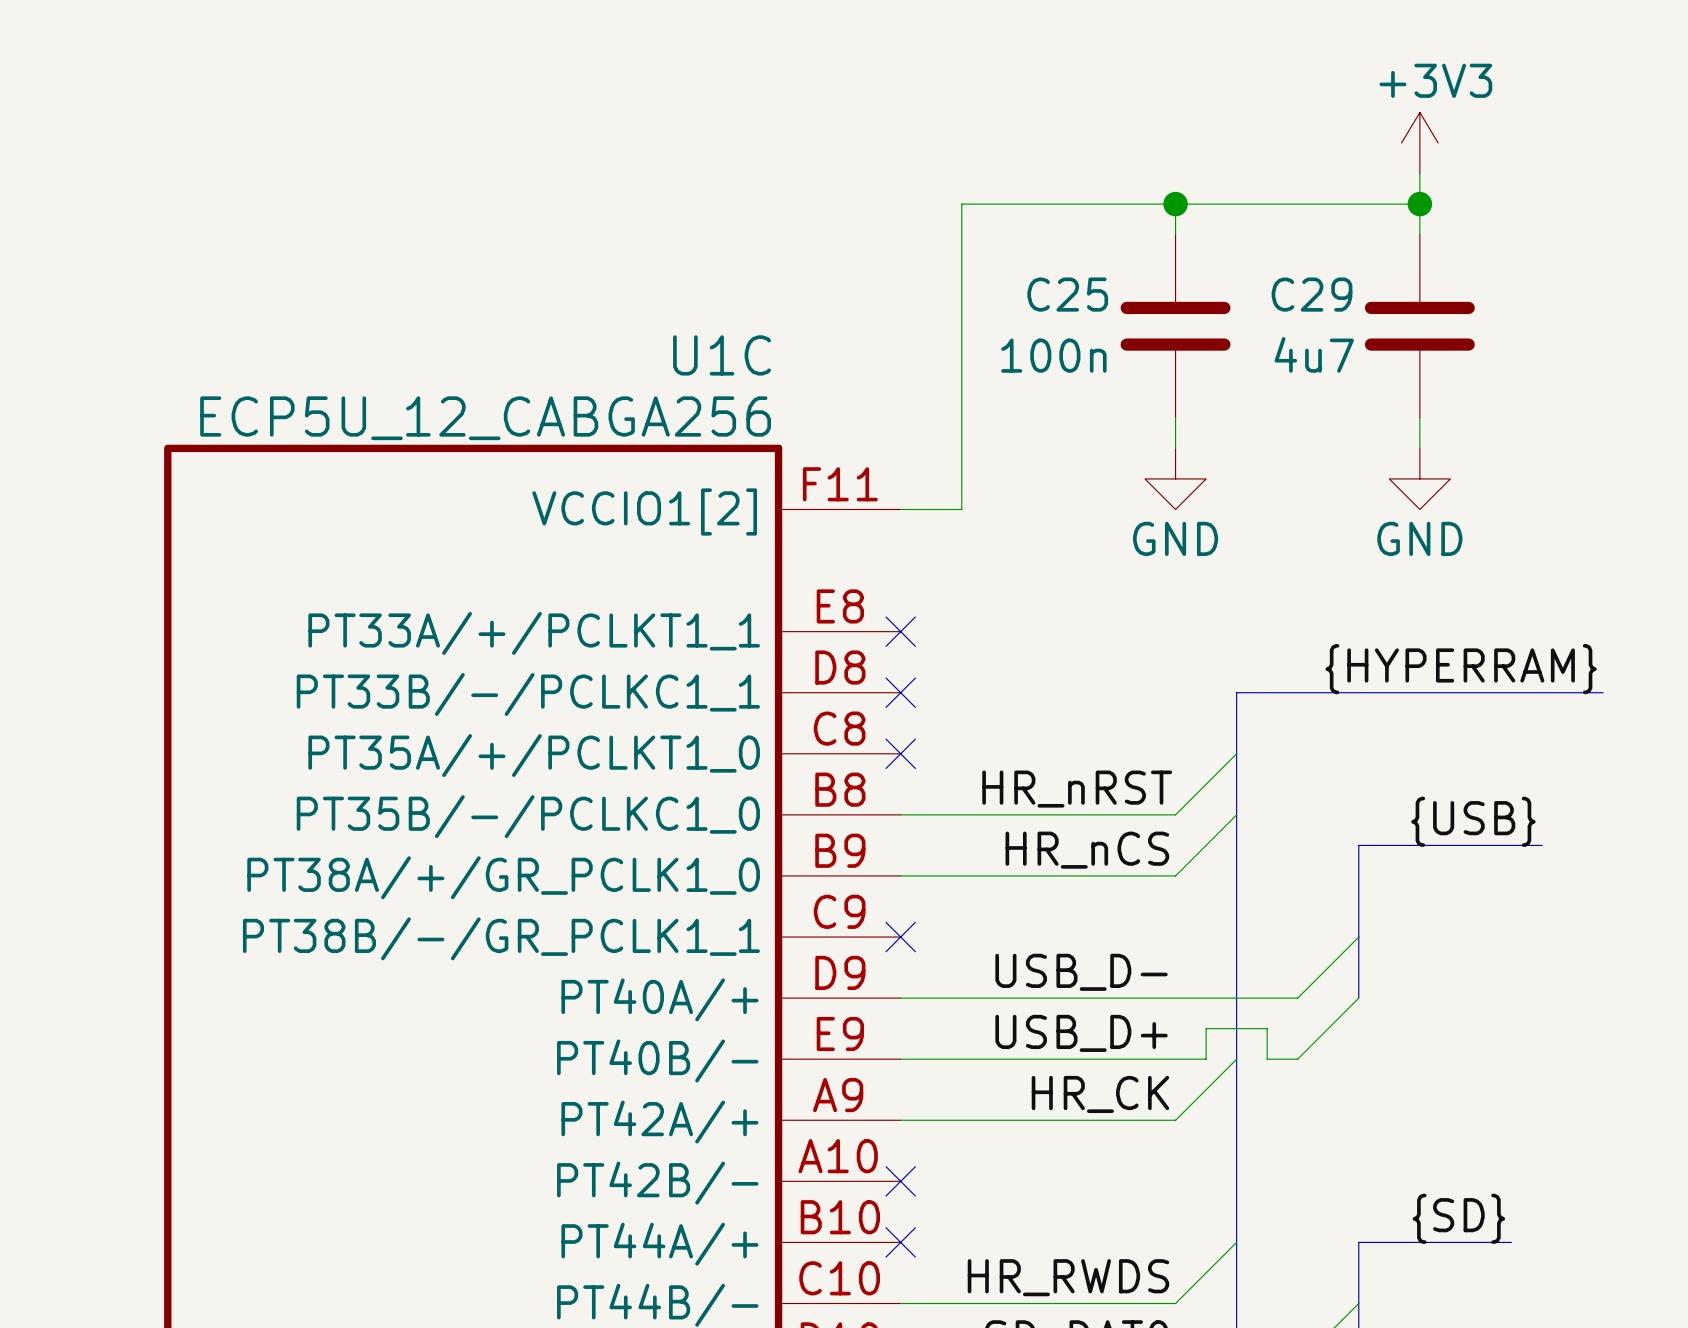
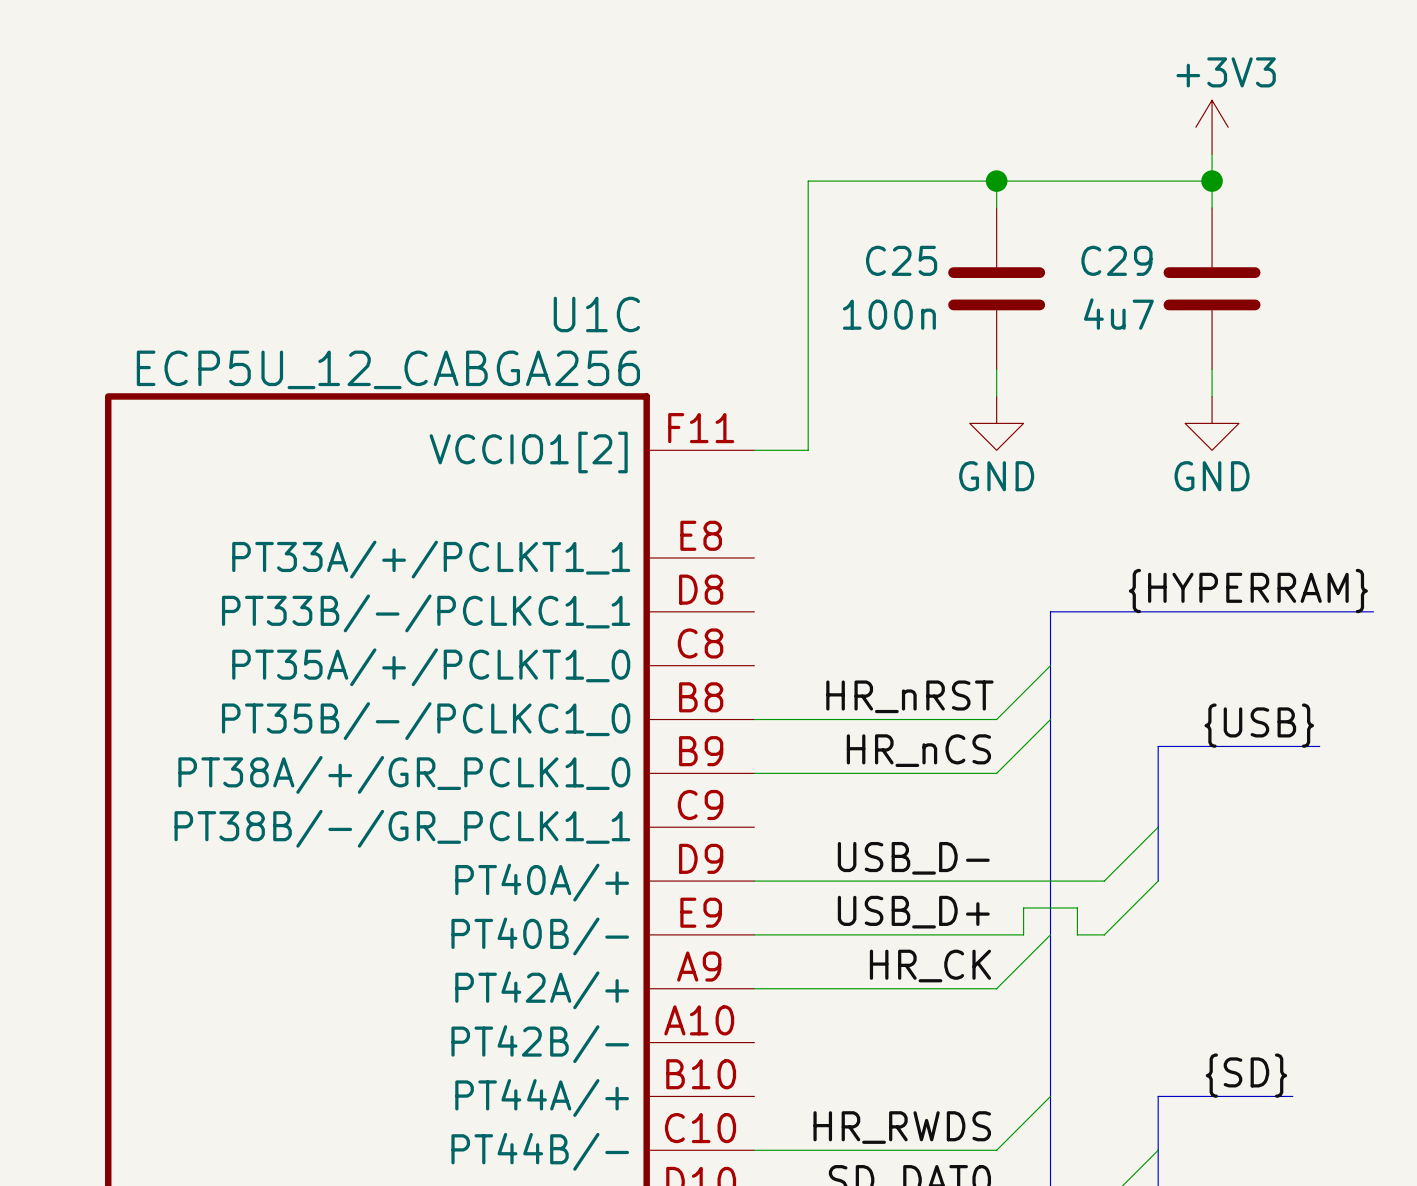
no-connect mark: (900, 631) -> none
no-connect mark: (900, 692) -> none
no-connect mark: (900, 753) -> none
no-connect mark: (900, 937) -> none
no-connect mark: (900, 1181) -> none
no-connect mark: (900, 1242) -> none

